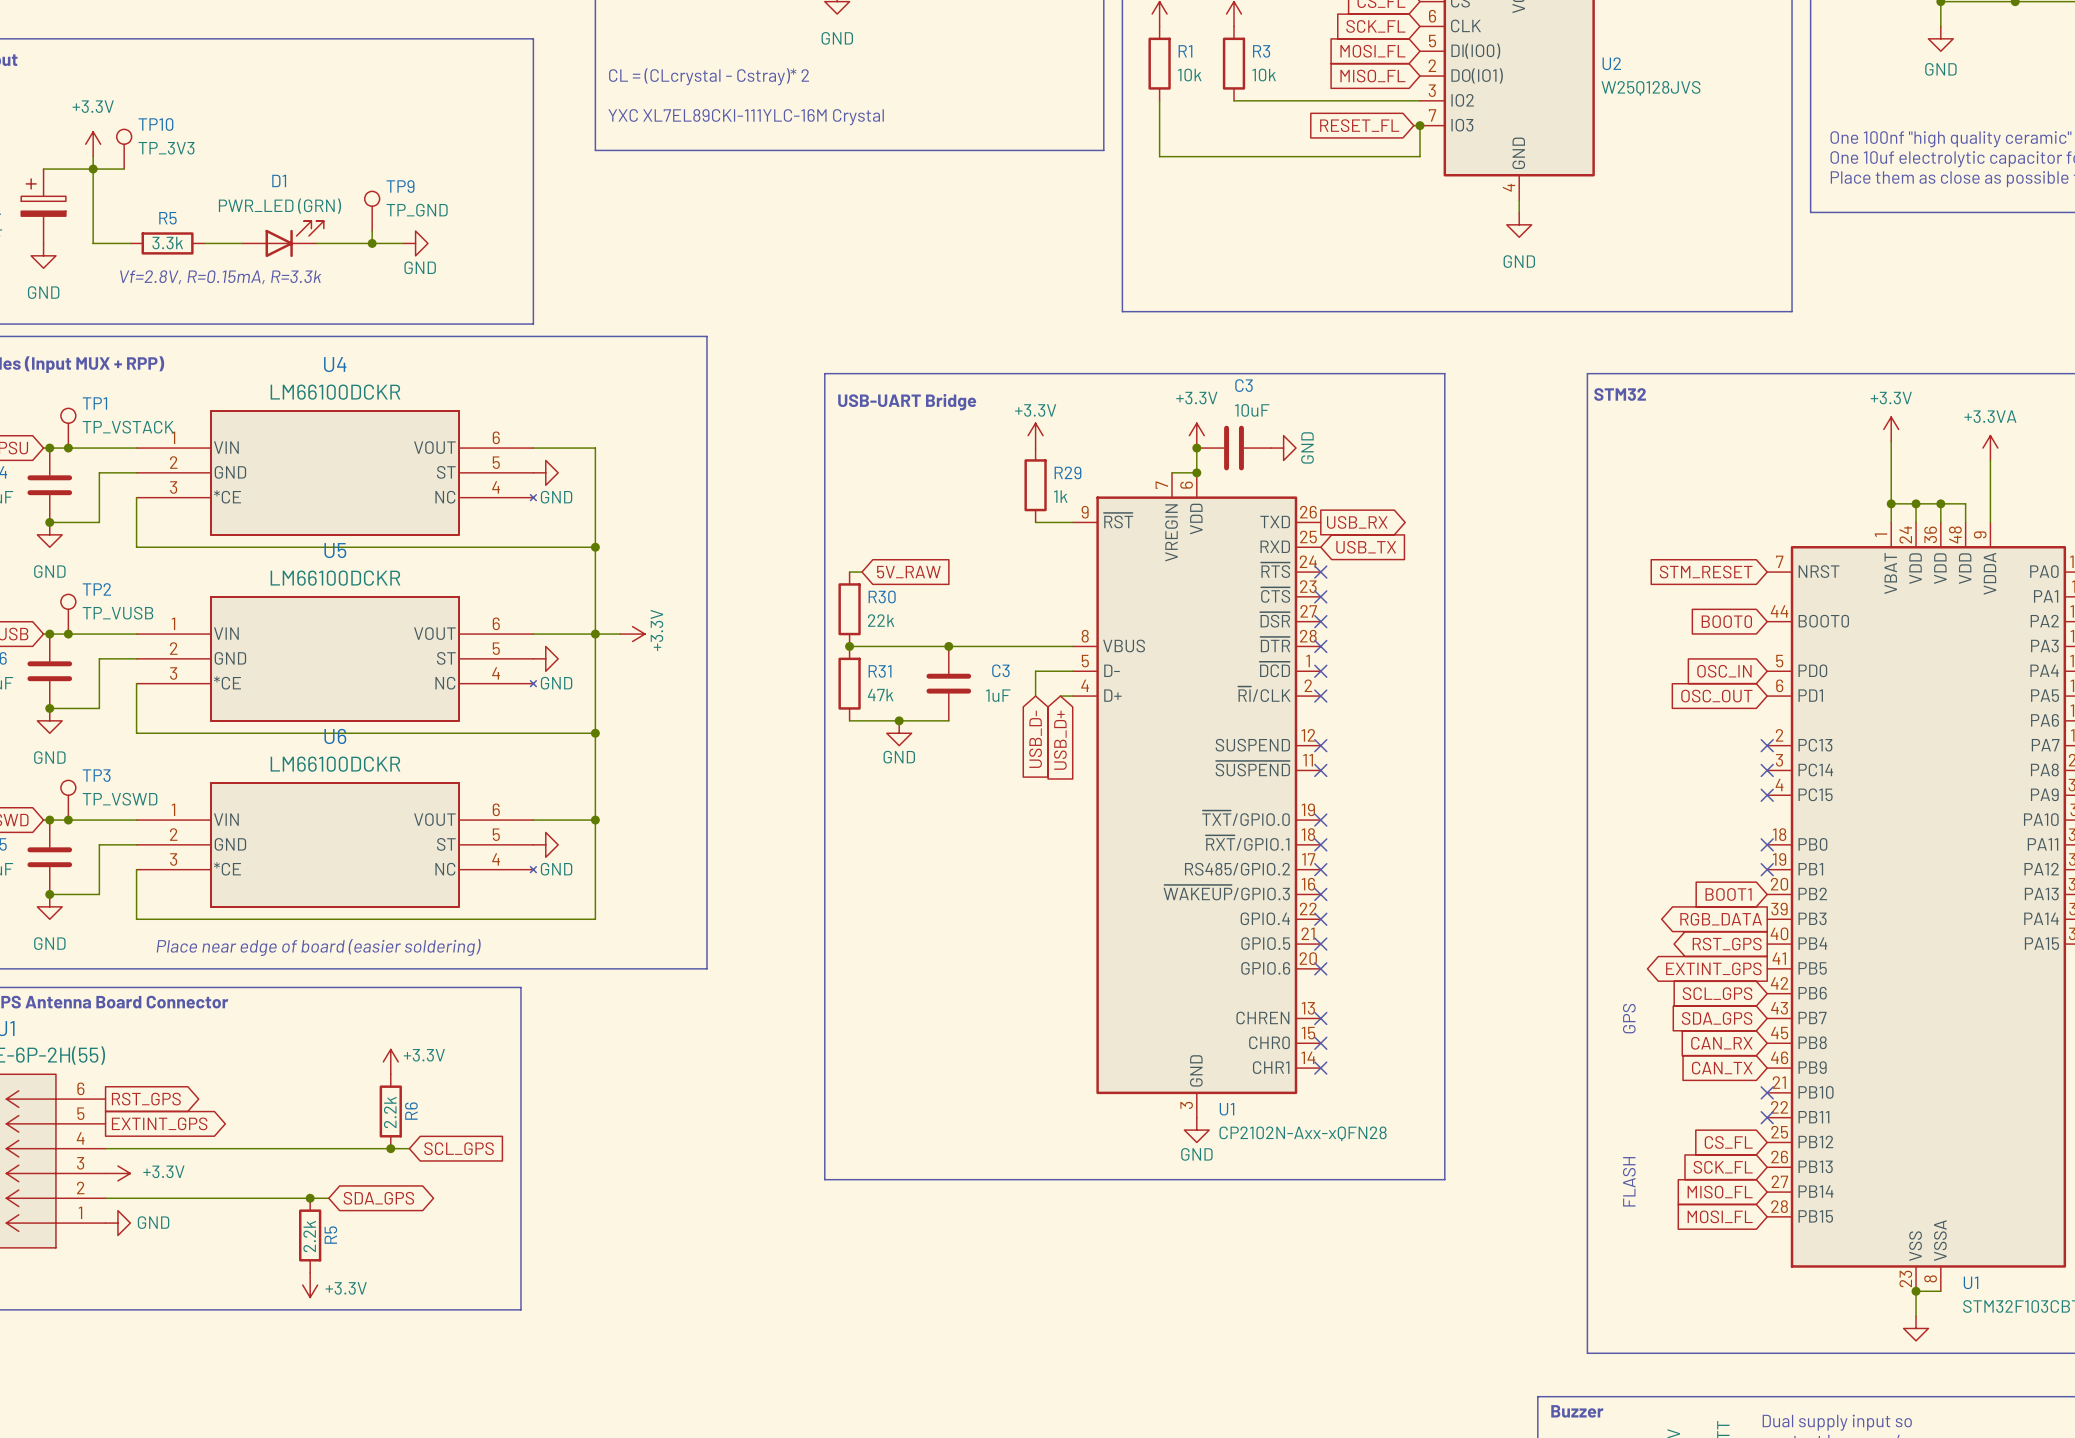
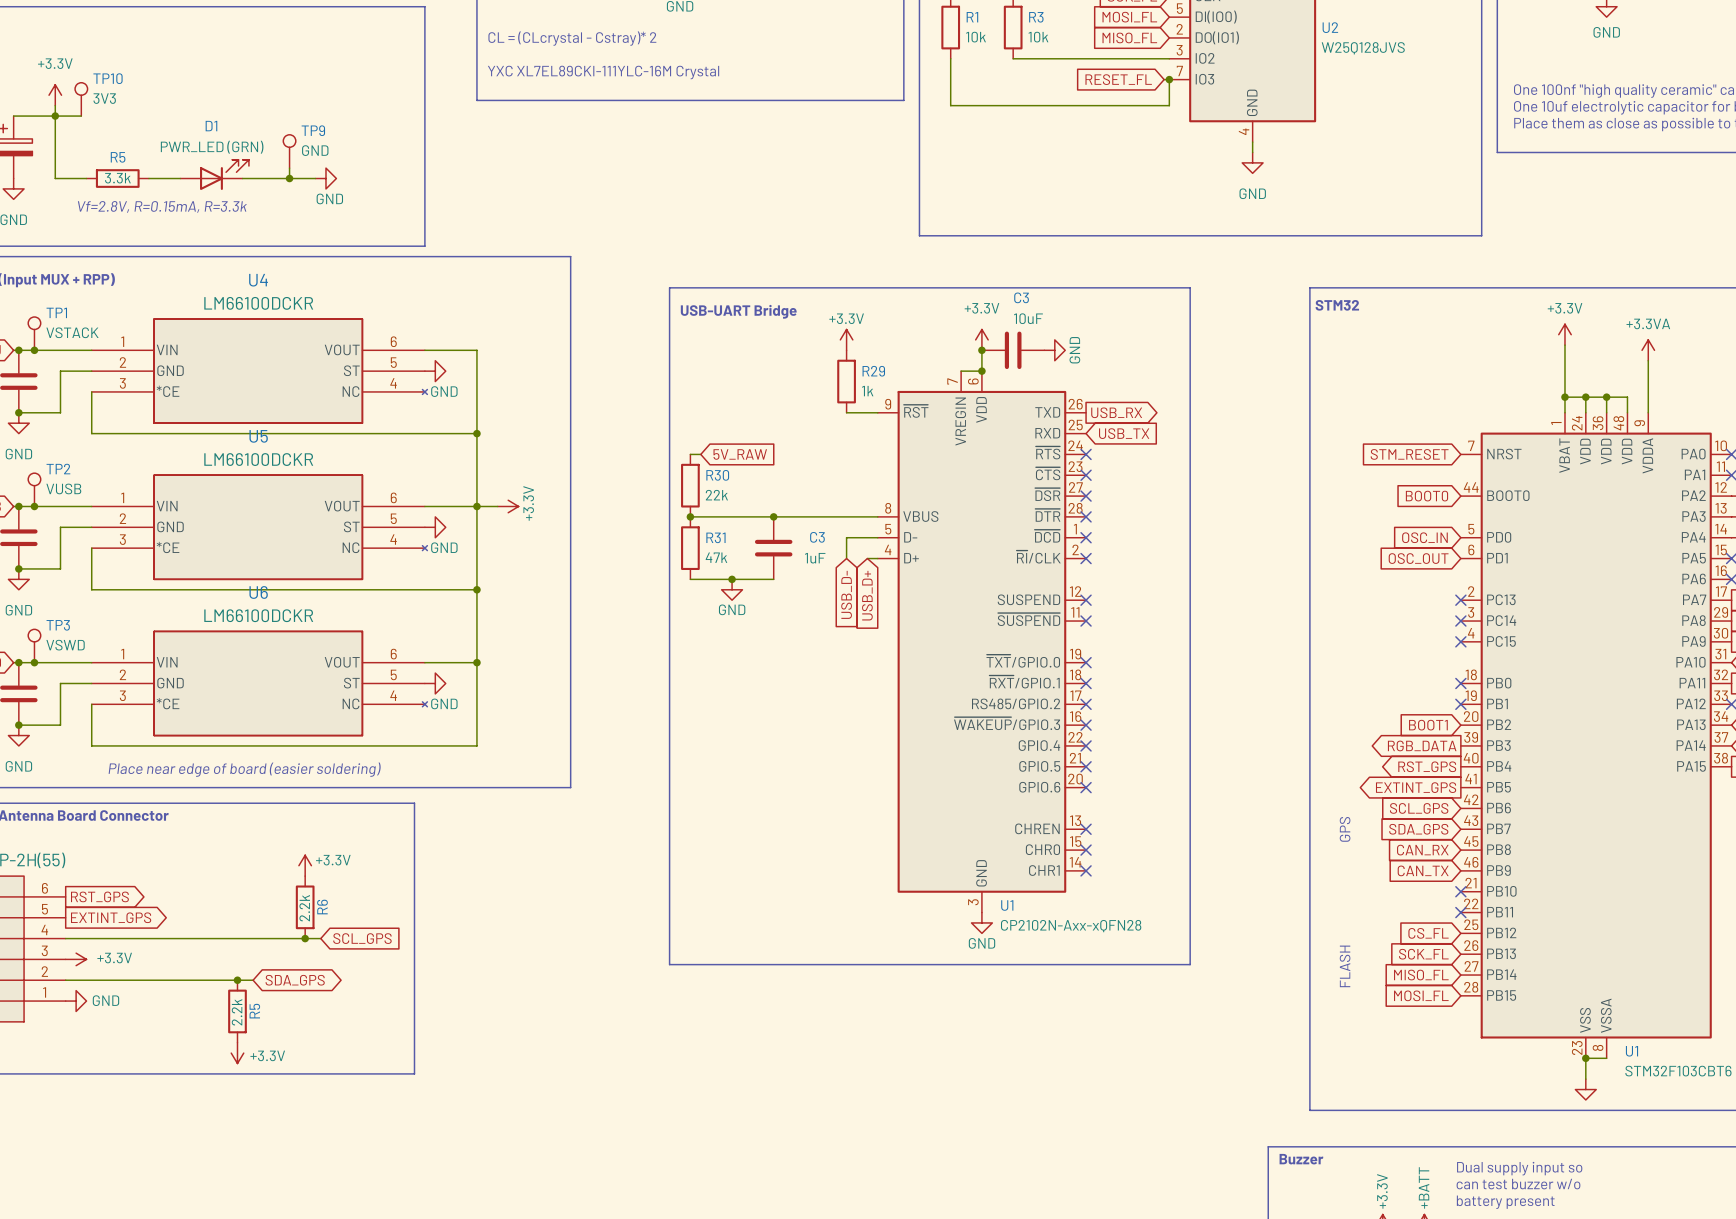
TP10 value: TP_3V3 (166, 148) -> 3V3 (104, 98)
TP9 value: TP_GND (417, 210) -> GND (315, 150)
TP1 value: TP_VSTACK (128, 427) -> VSTACK (72, 332)
TP2 value: TP_VUSB (118, 613) -> VUSB (63, 488)
TP3 value: TP_VSWD (120, 799) -> VSWD (65, 645)

